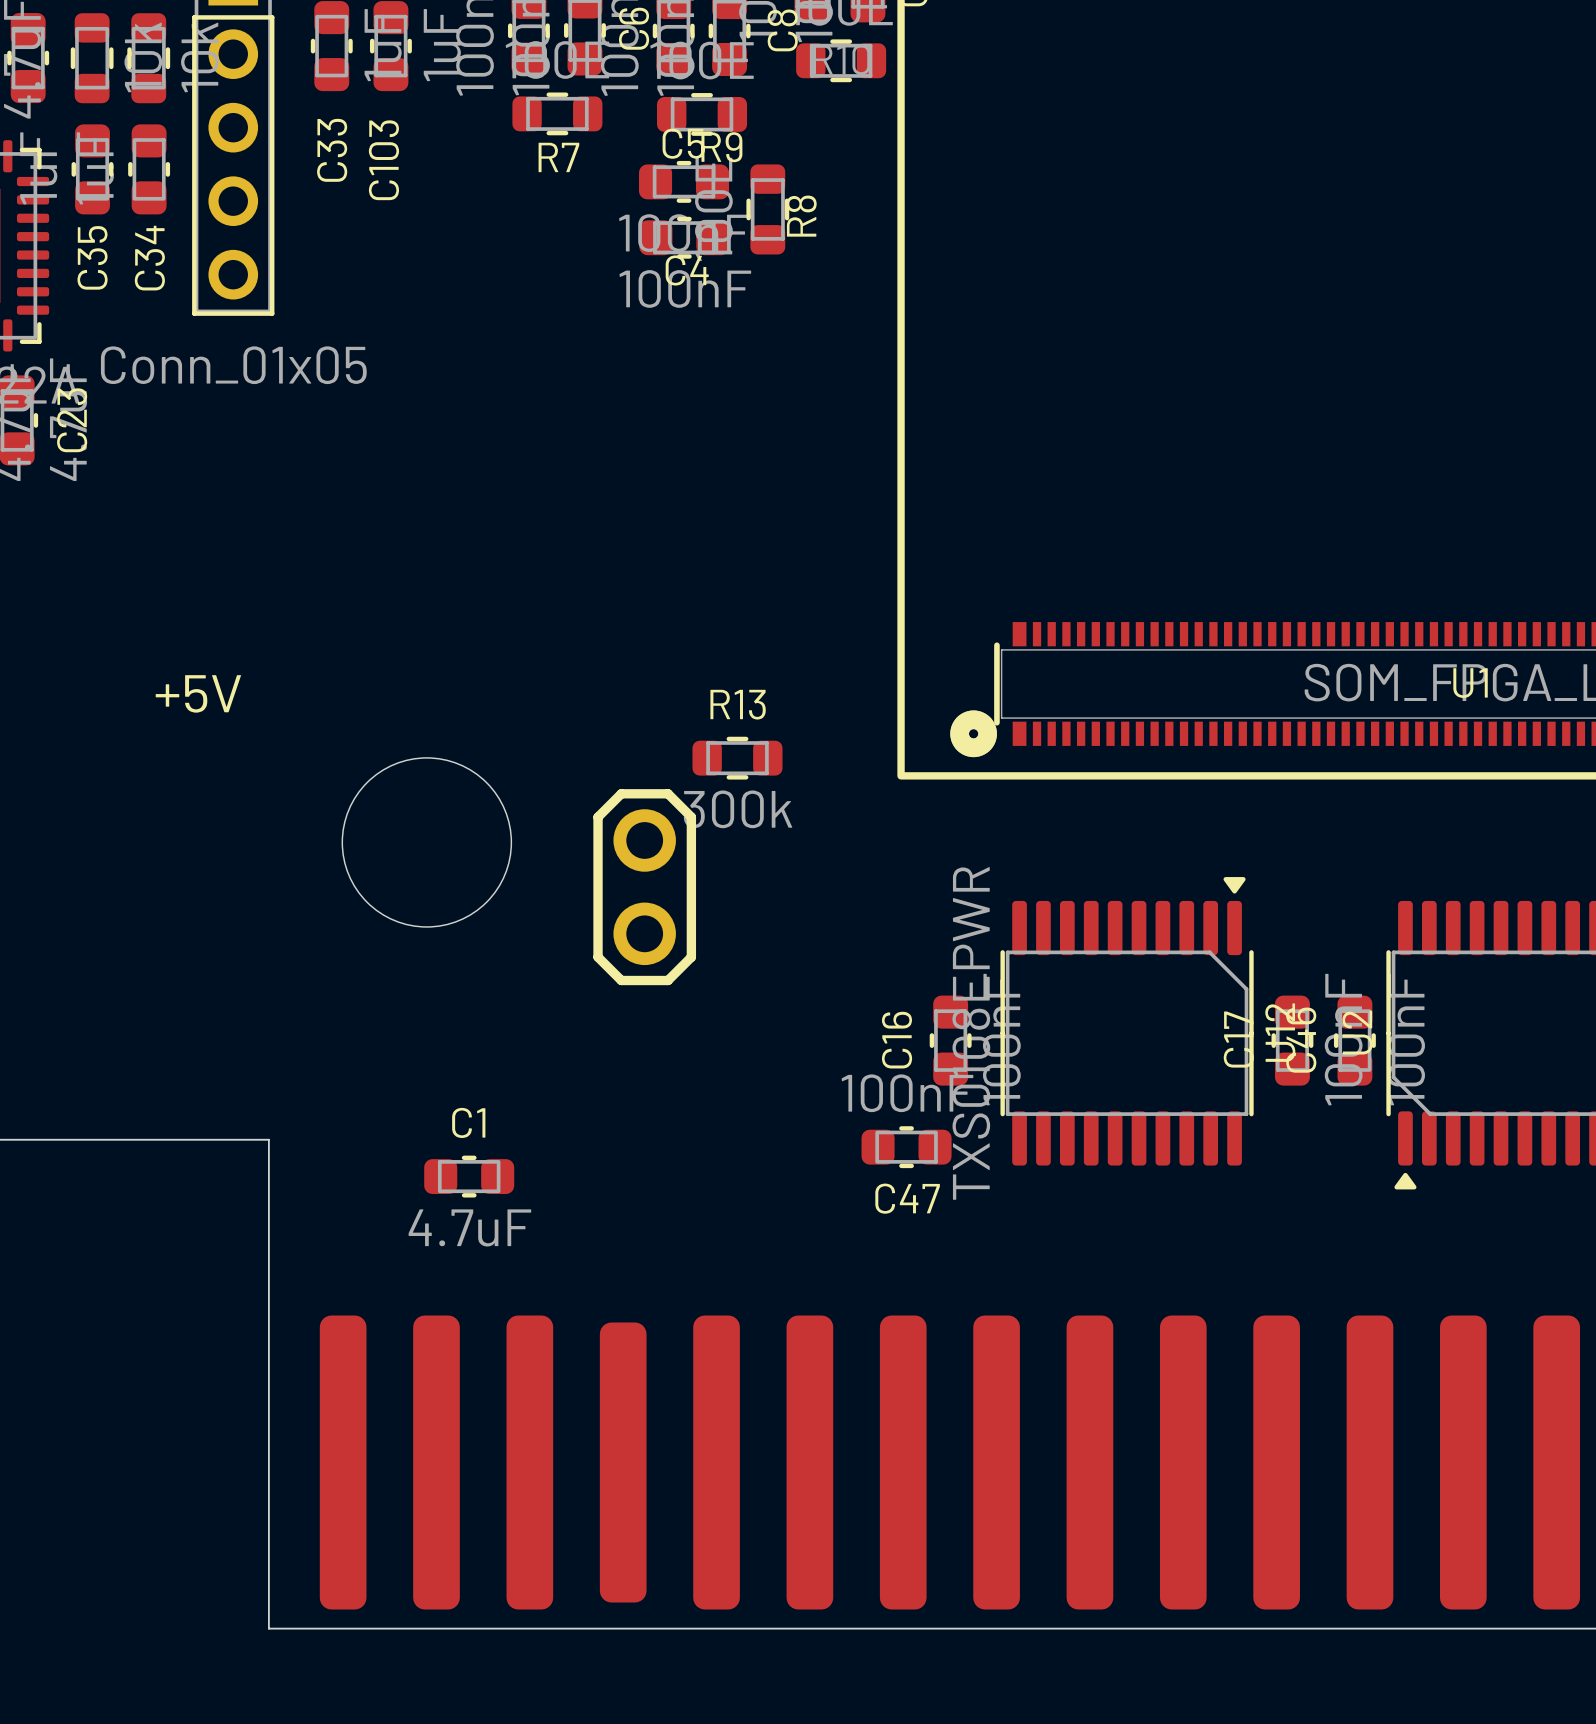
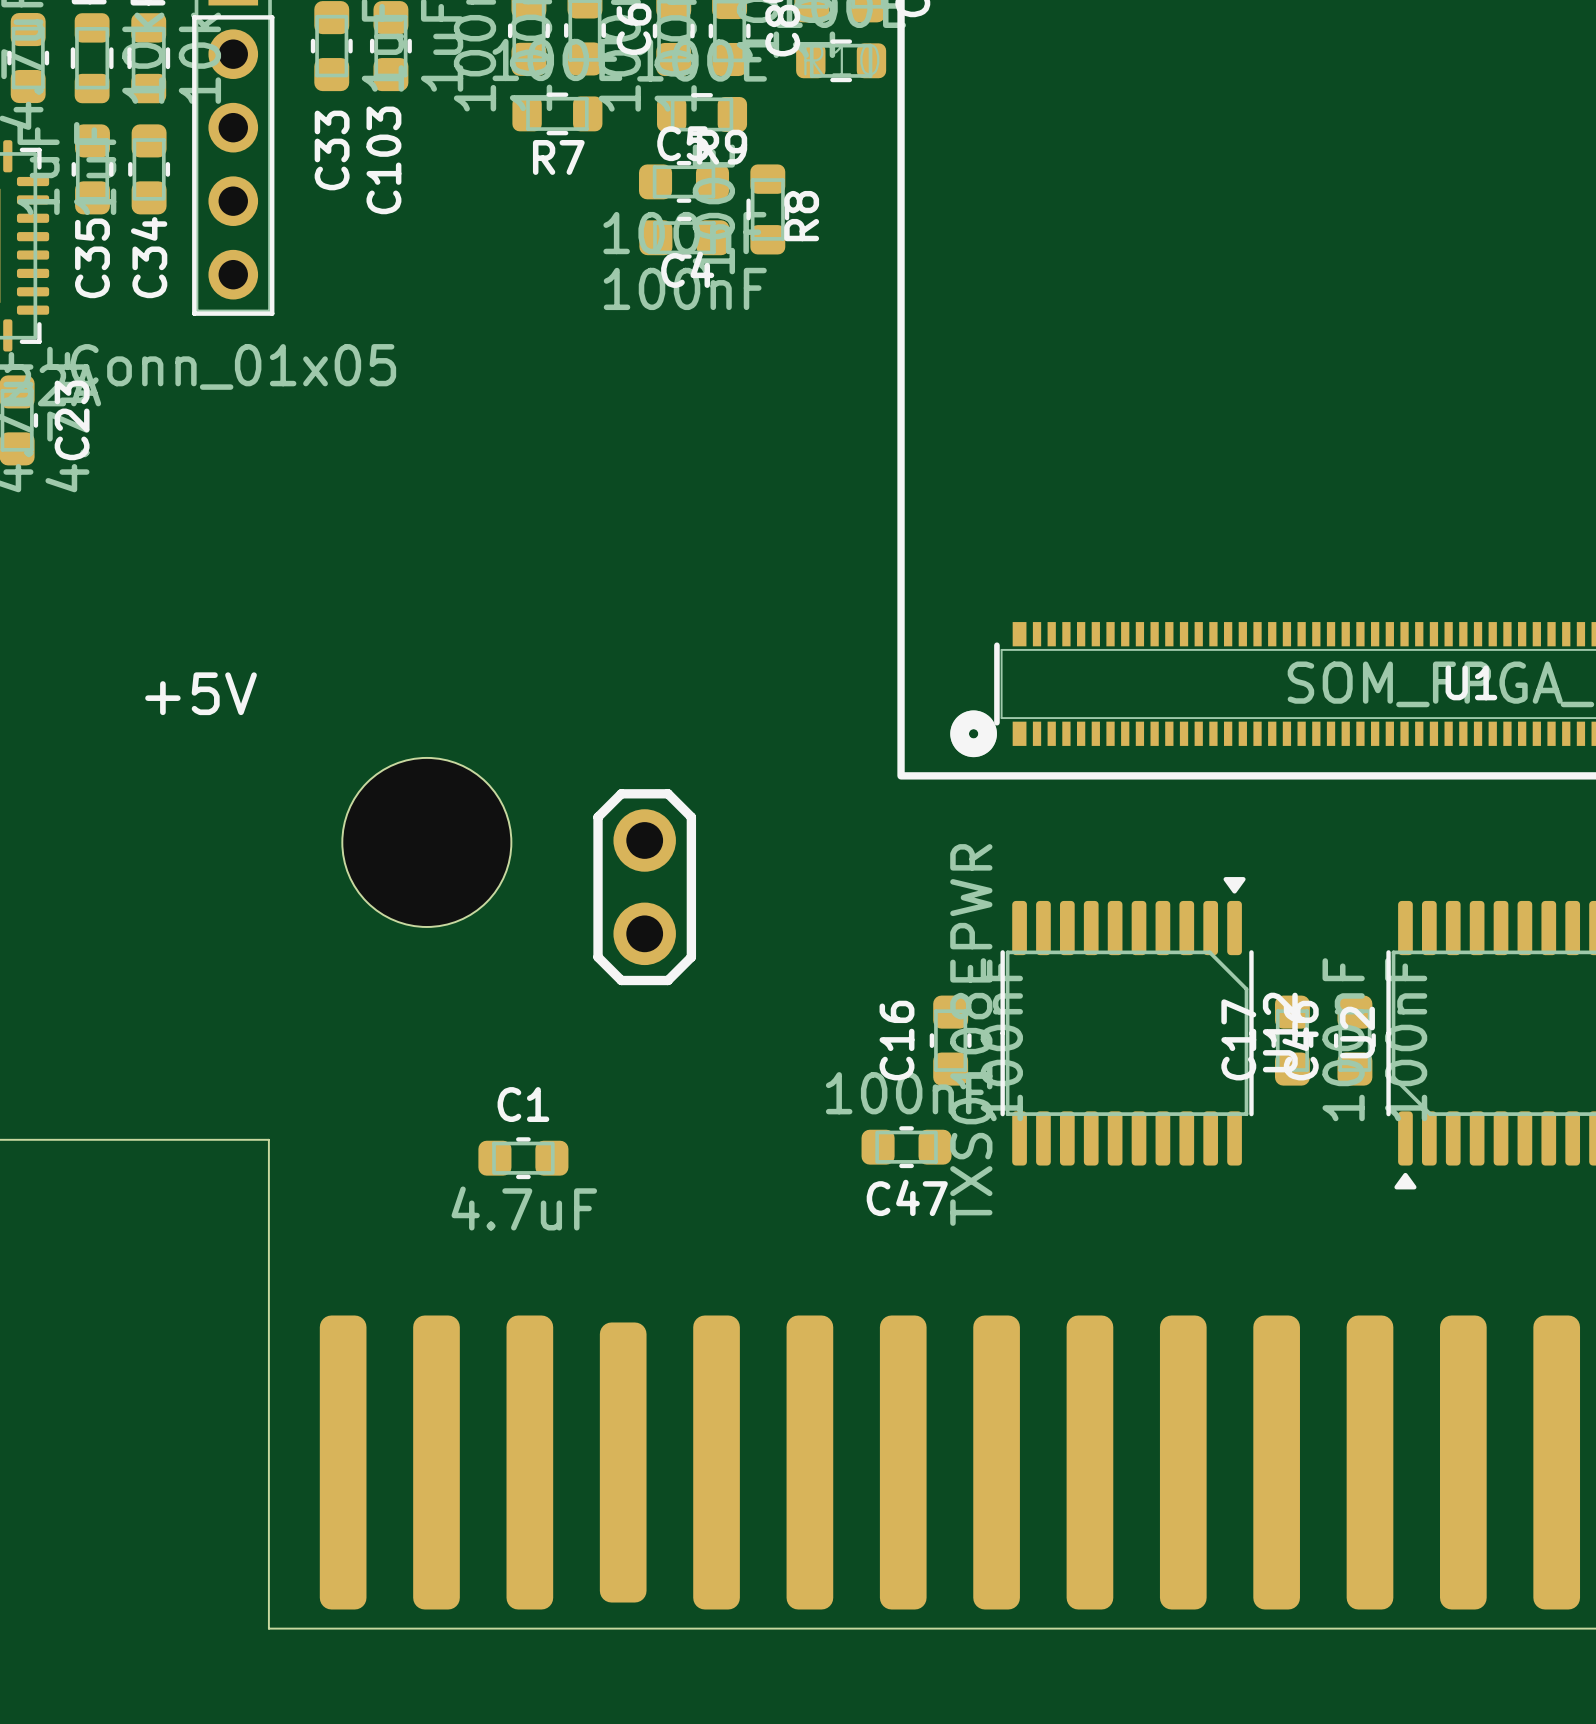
R13: 300k (737, 758) -> none
C1 position: (469, 1176) -> (523, 1158)

